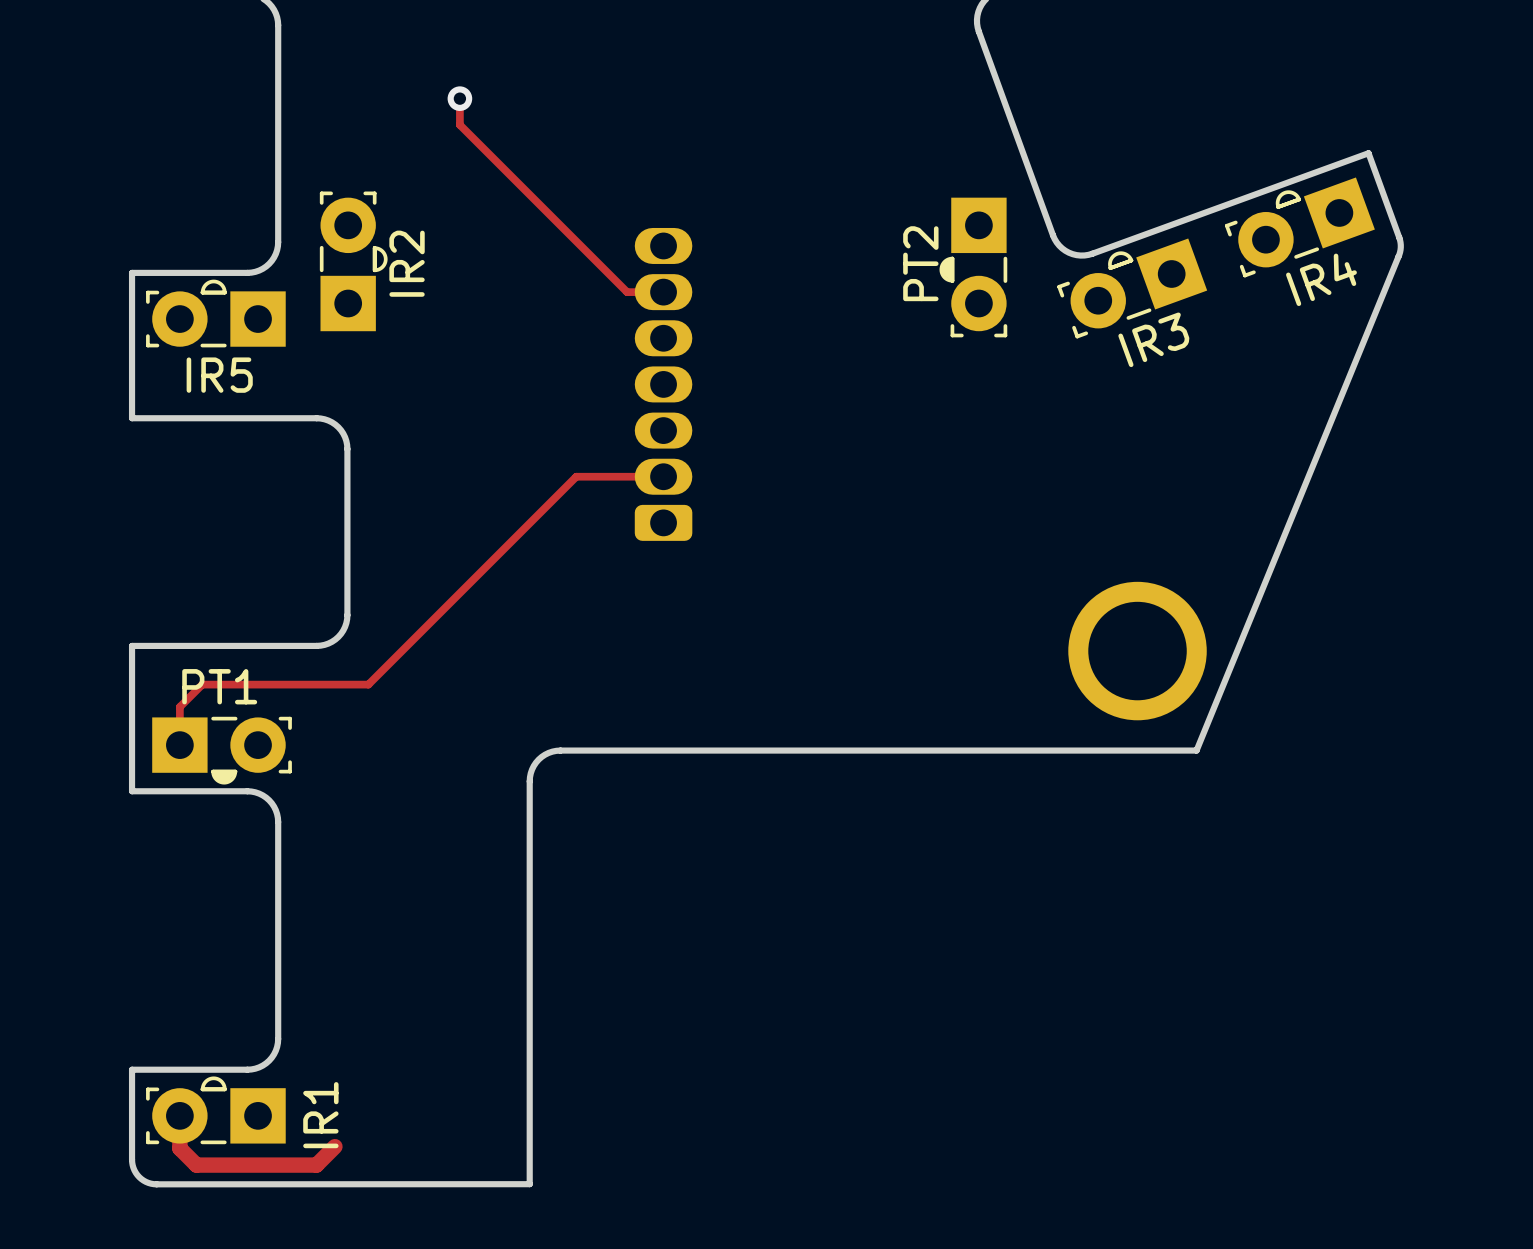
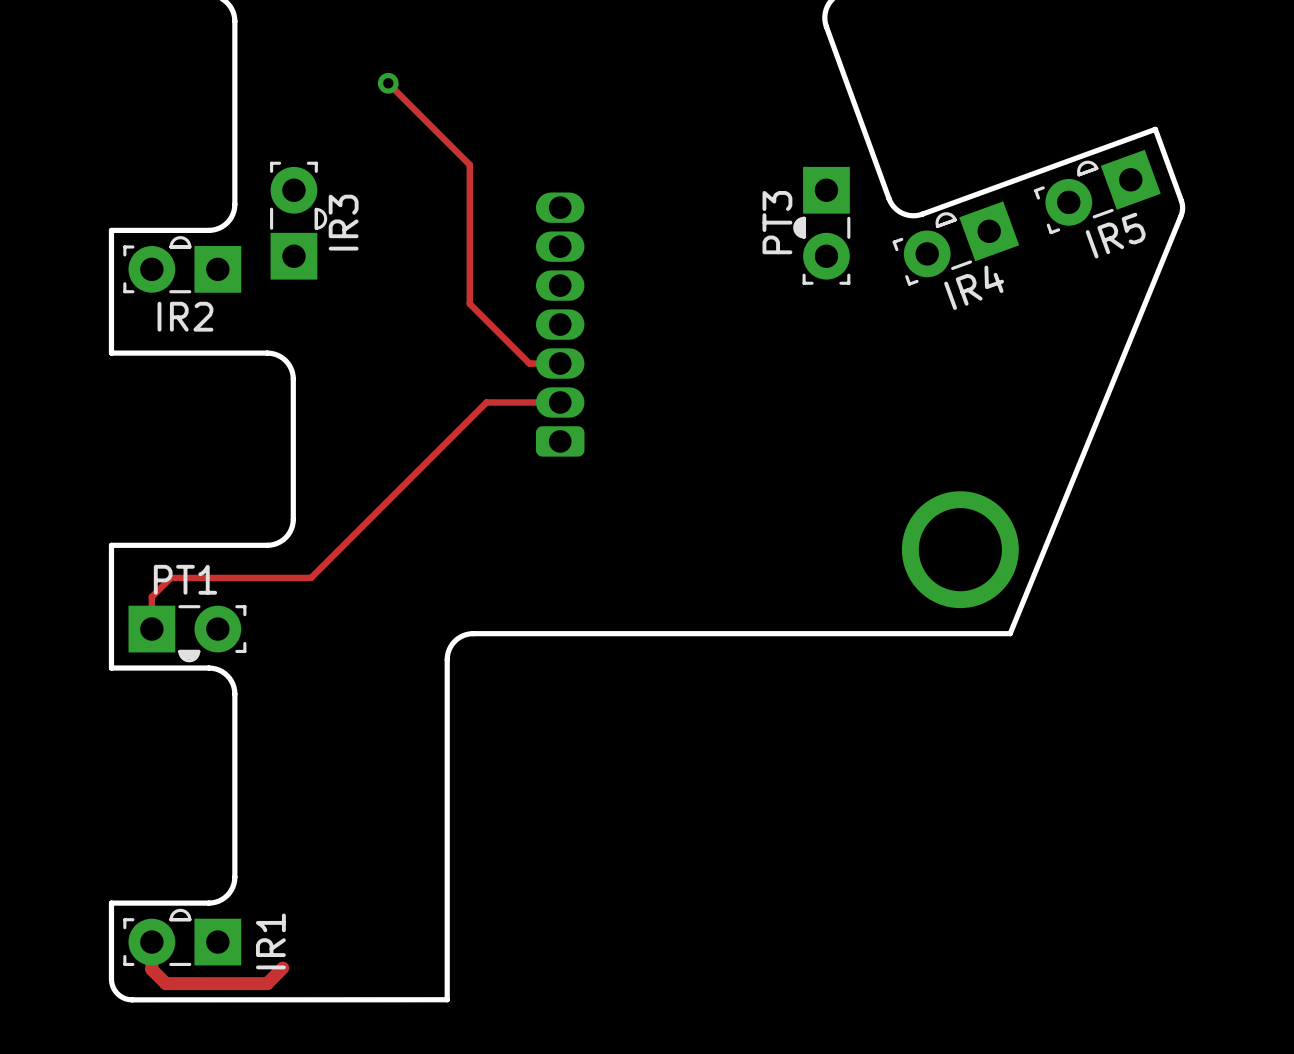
track: (459, 98) (459, 124) (627, 292) (663, 292) -> (388, 83) (469, 164) (469, 303) (529, 363) (560, 363)
IR2 name: IR2 (407, 263) -> IR3 (343, 222)
PT2 name: PT2 (920, 263) -> PT3 (777, 222)
IR4 name: IR4 (1321, 279) -> IR5 (1115, 235)
IR3 name: IR3 (1153, 339) -> IR4 (974, 287)
IR5 name: IR5 (219, 375) -> IR2 (185, 316)

